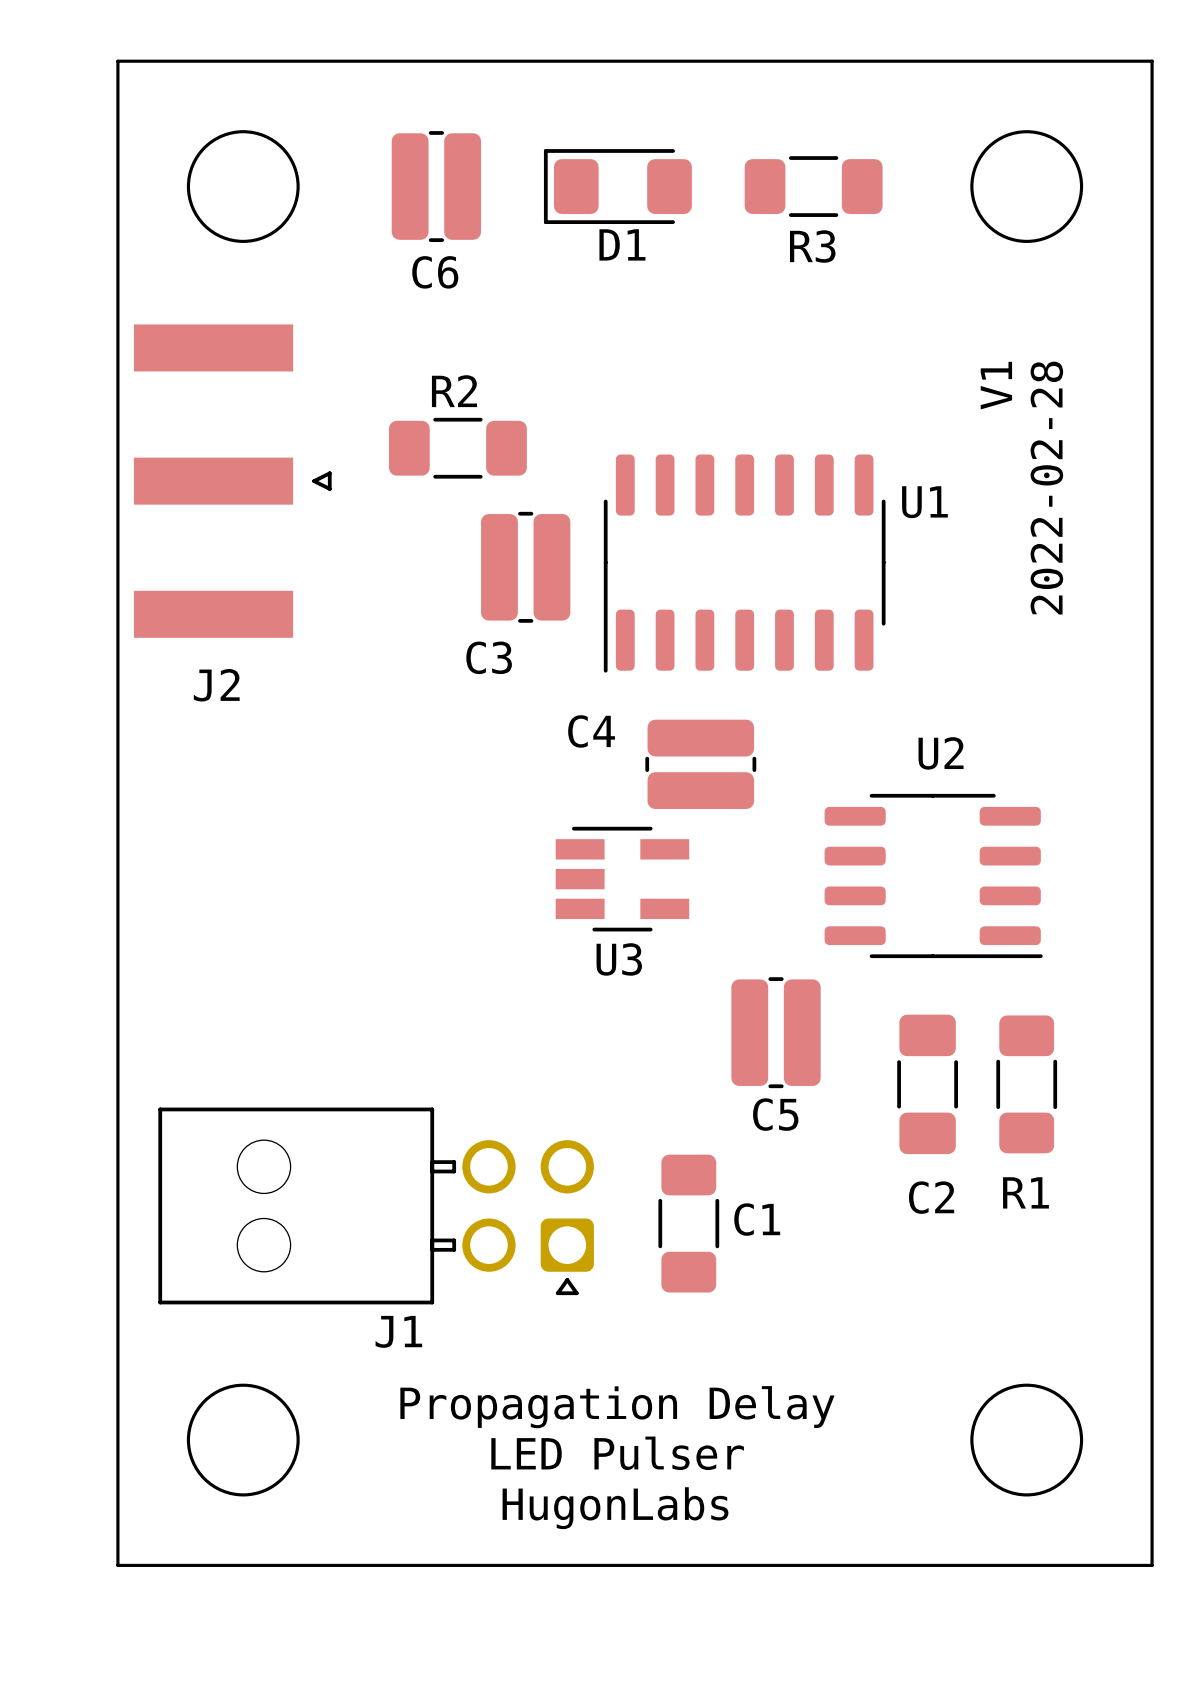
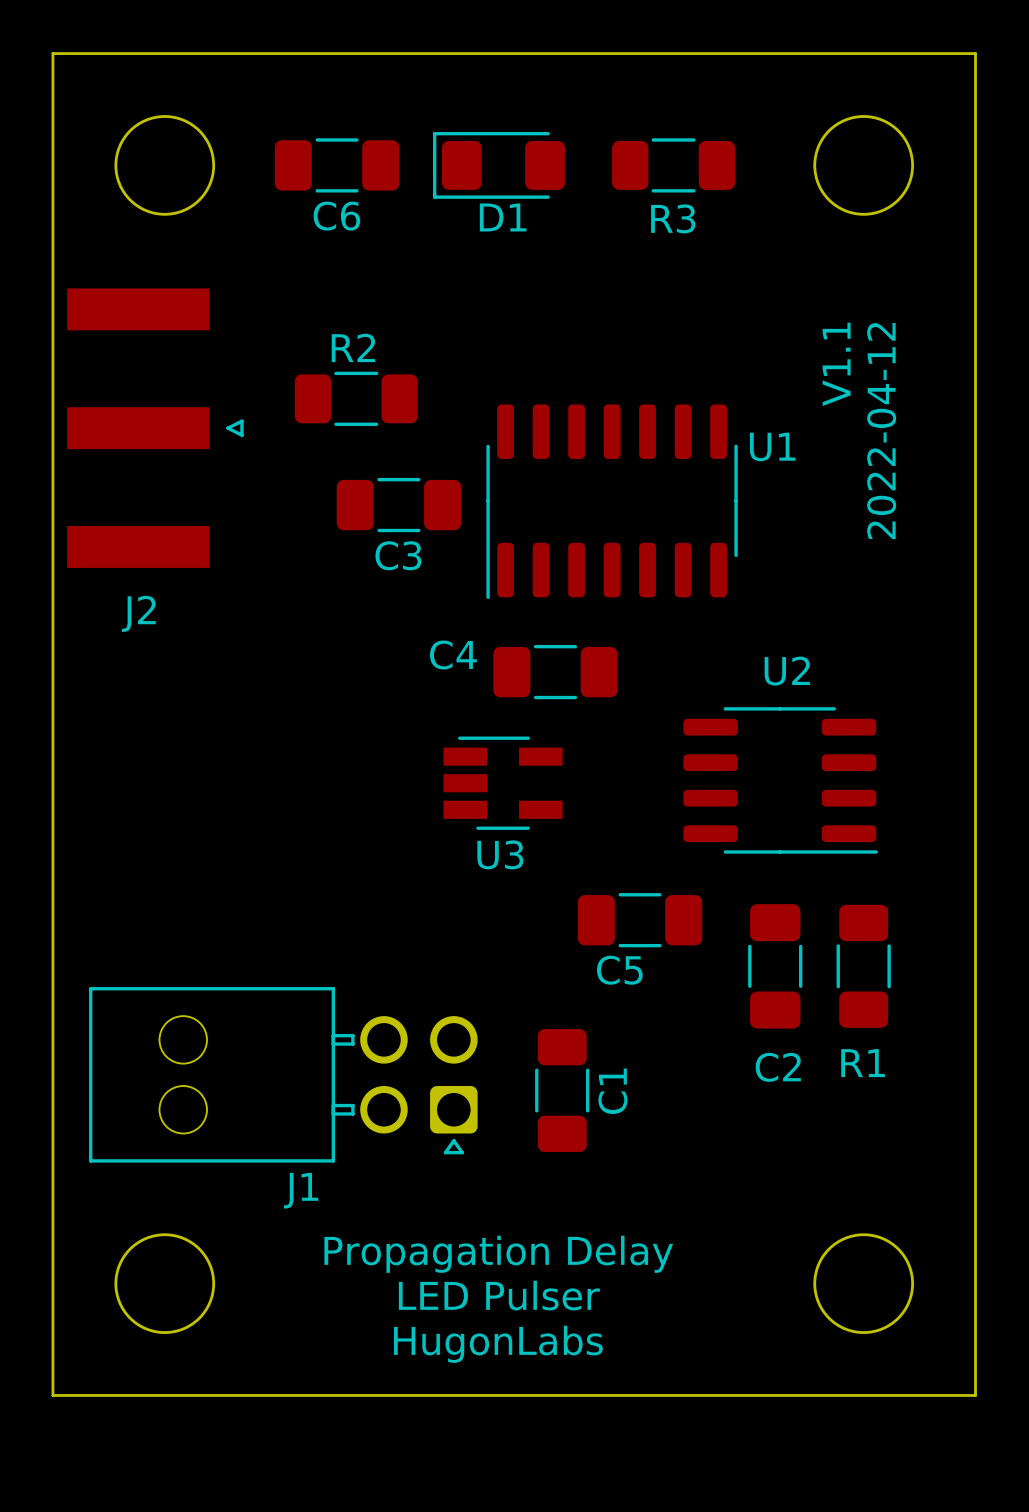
C6 footprint: [391, 131, 482, 243] -> [274, 138, 400, 193]
text: V1 (996, 385) -> V1.1 (836, 364)
text: 2022-02-28 (1046, 488) -> 2022-04-12 (881, 431)
C3 footprint: [481, 511, 571, 623] -> [336, 477, 462, 533]
C4 footprint: [645, 719, 757, 810] -> [493, 644, 618, 700]
C5 footprint: [731, 977, 821, 1089] -> [577, 893, 703, 948]
C1 name rotation: 0° (757, 1219) -> 90° counterclockwise (612, 1091)

